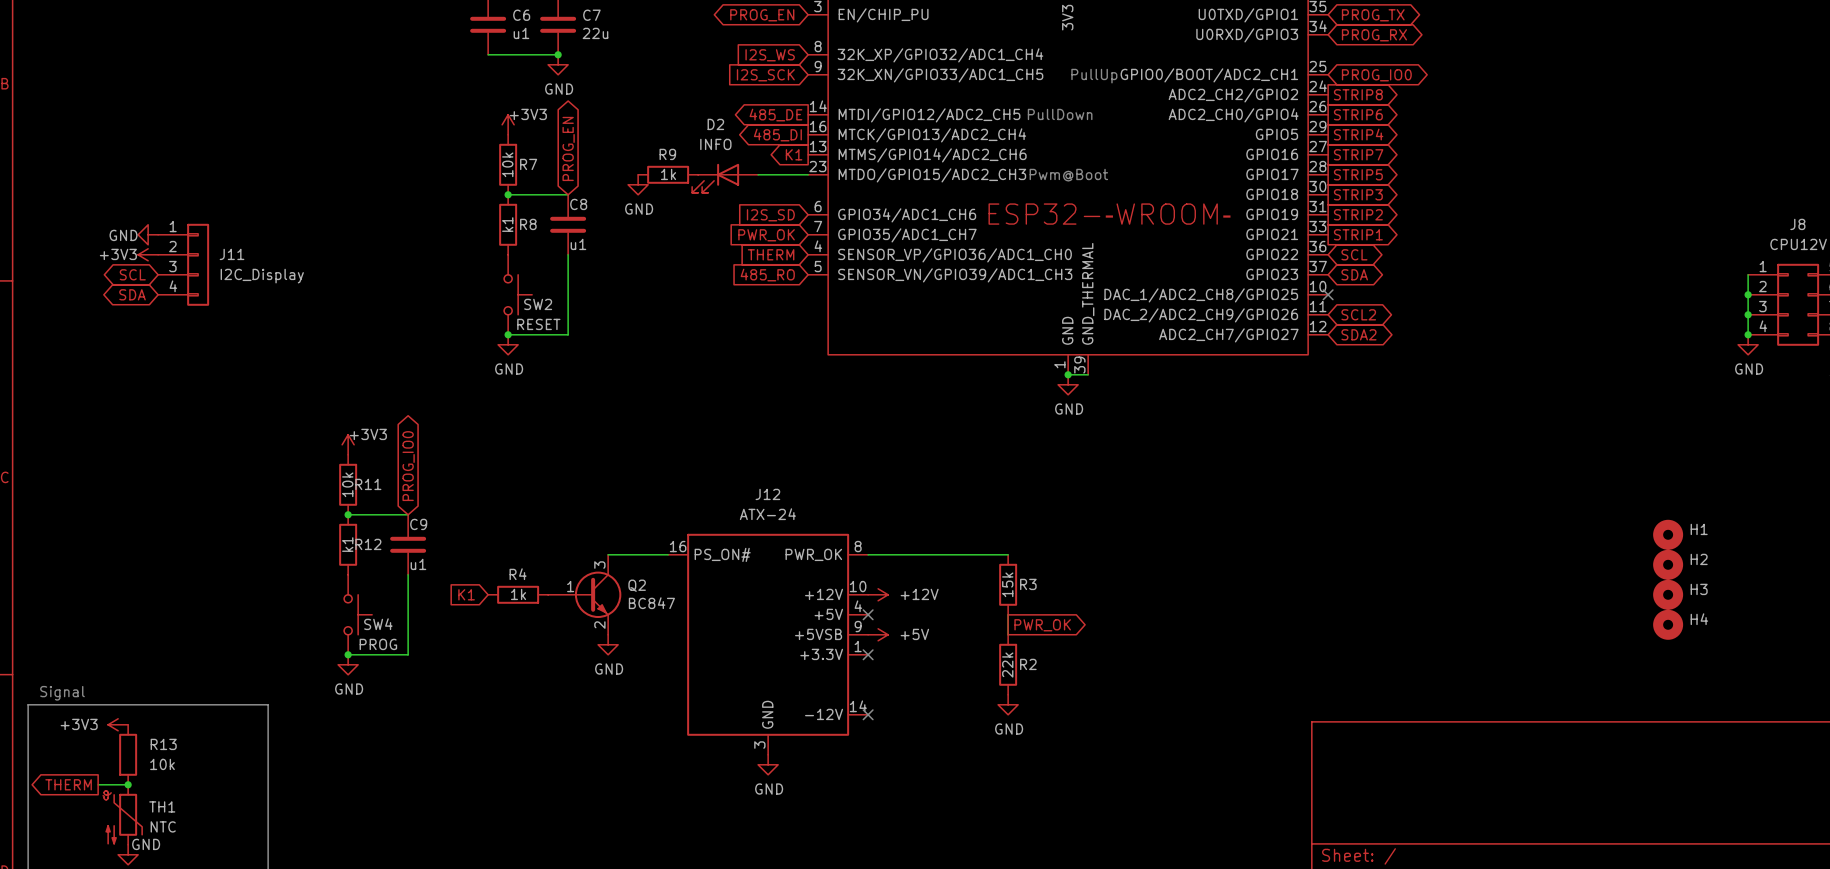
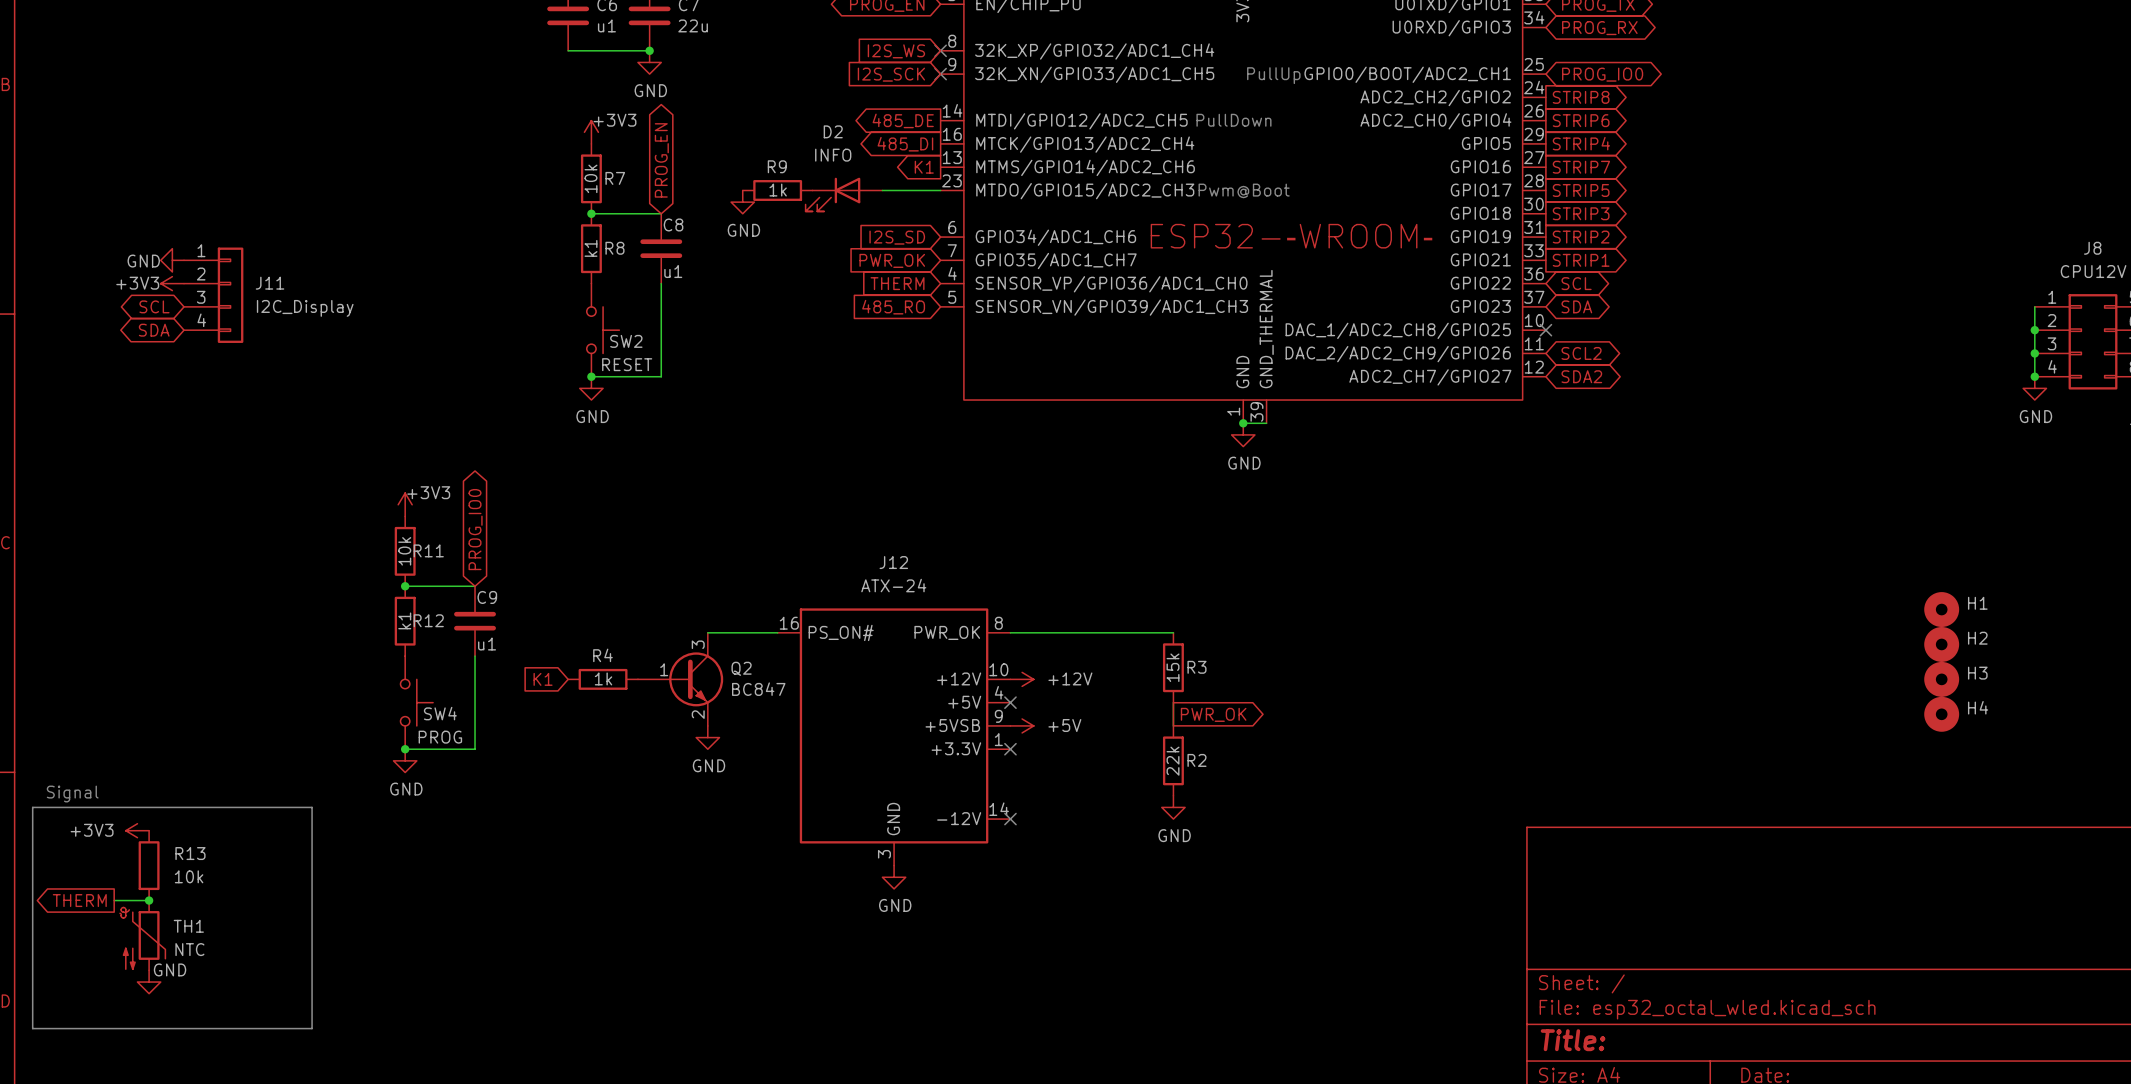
no-connect mark: none -> (940, 50)
no-connect mark: none -> (940, 74)

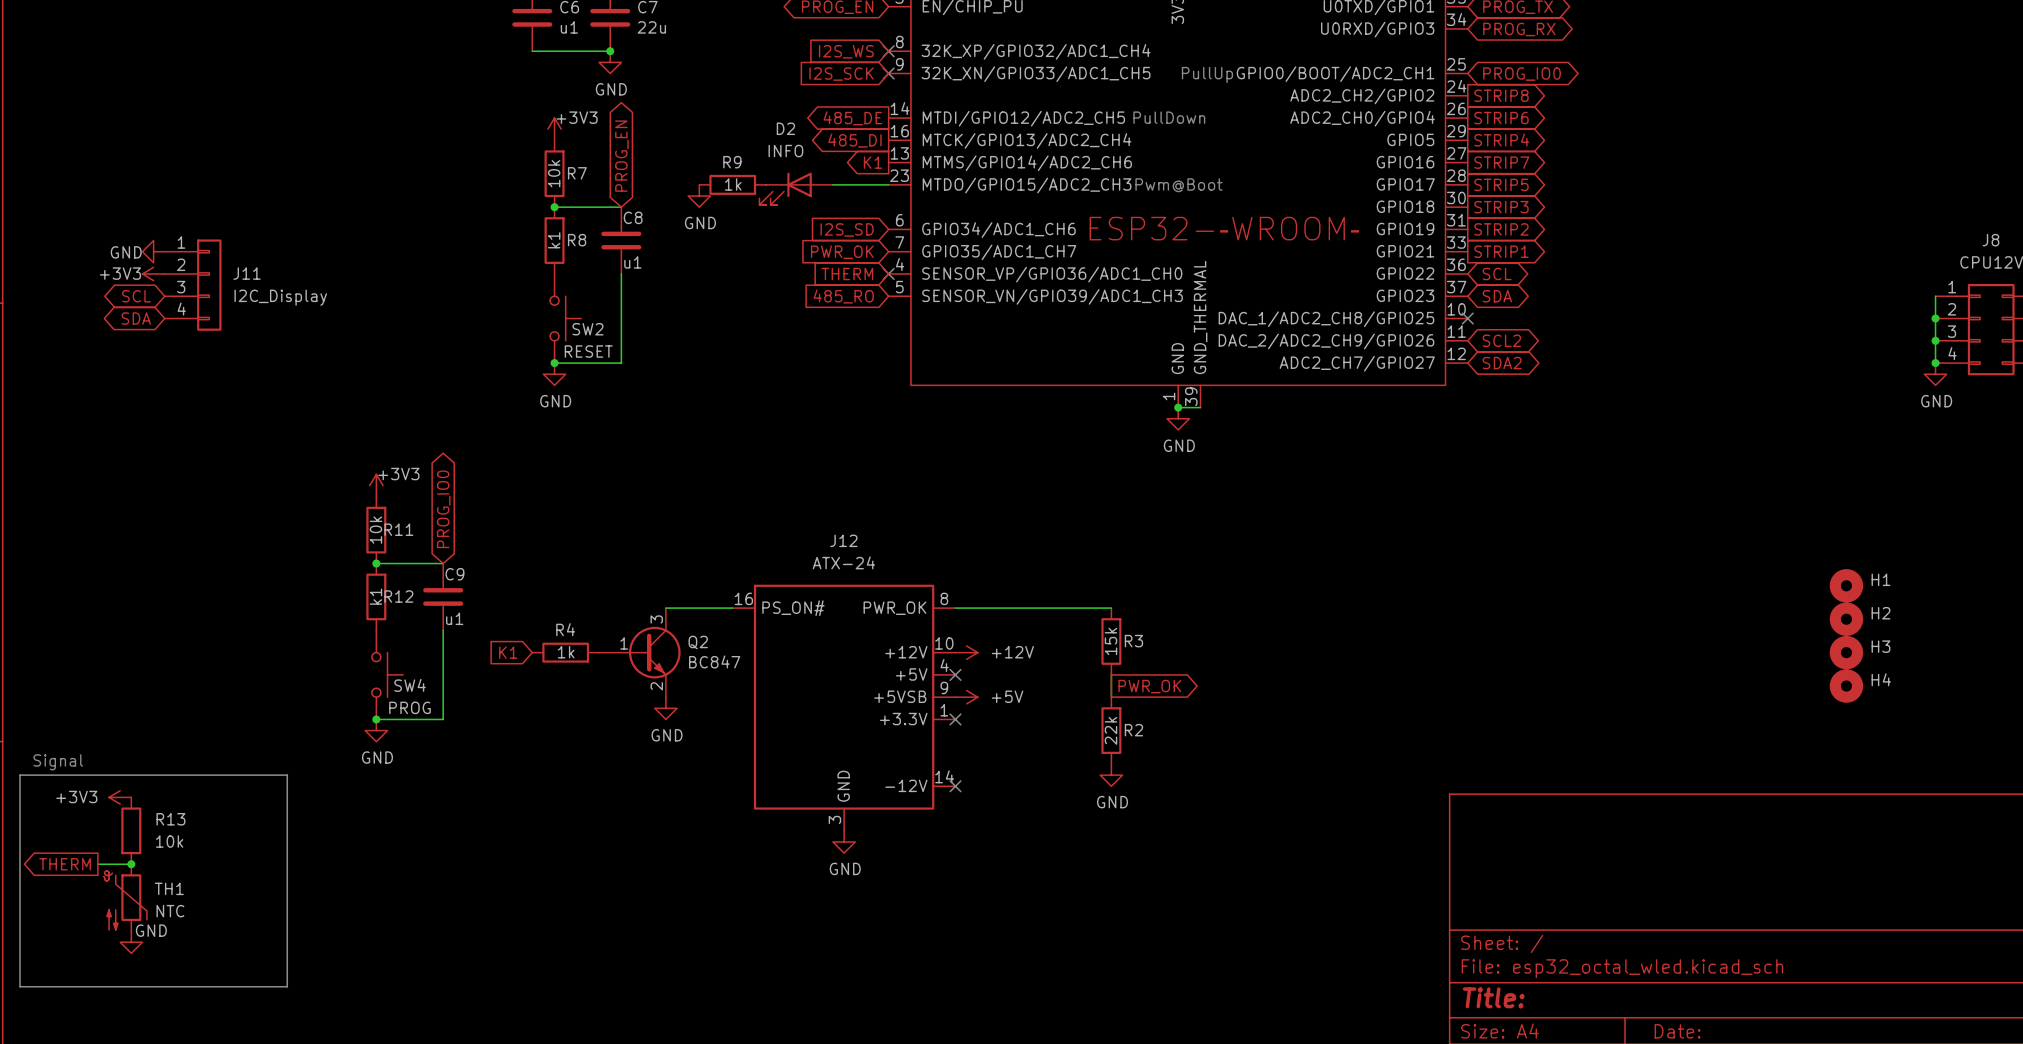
no-connect mark: none -> (888, 273)

